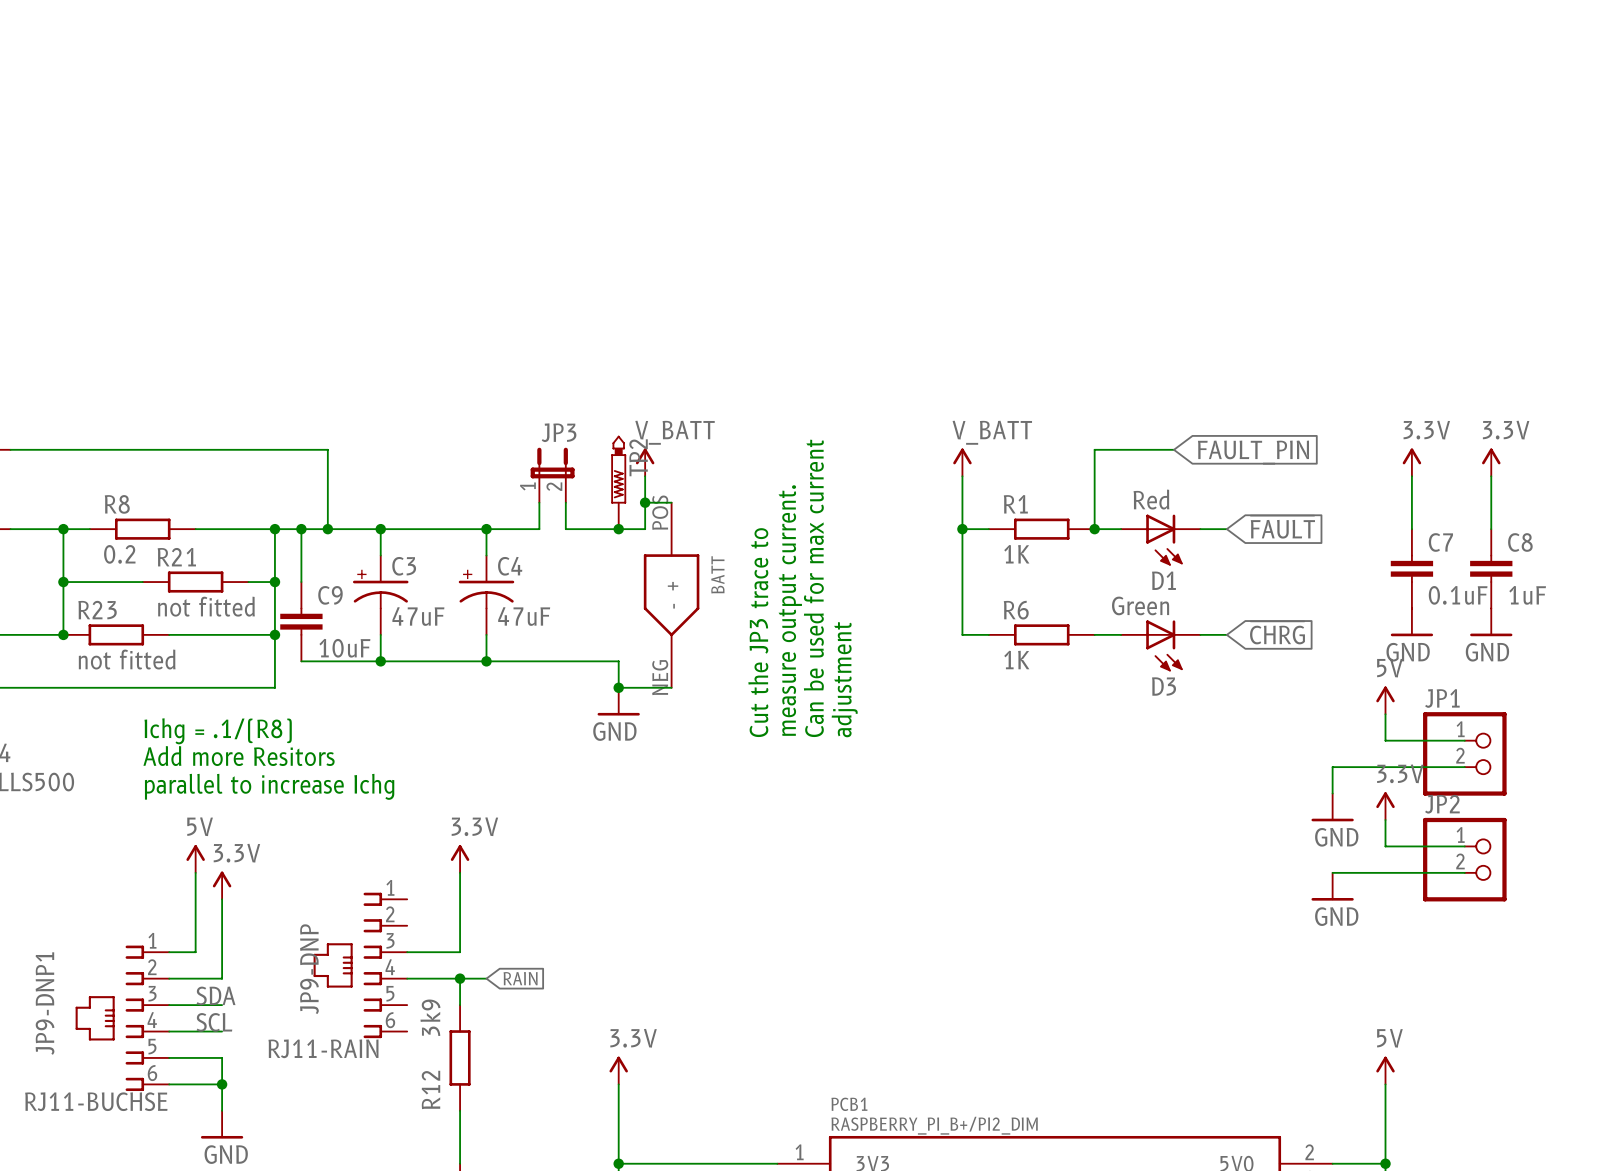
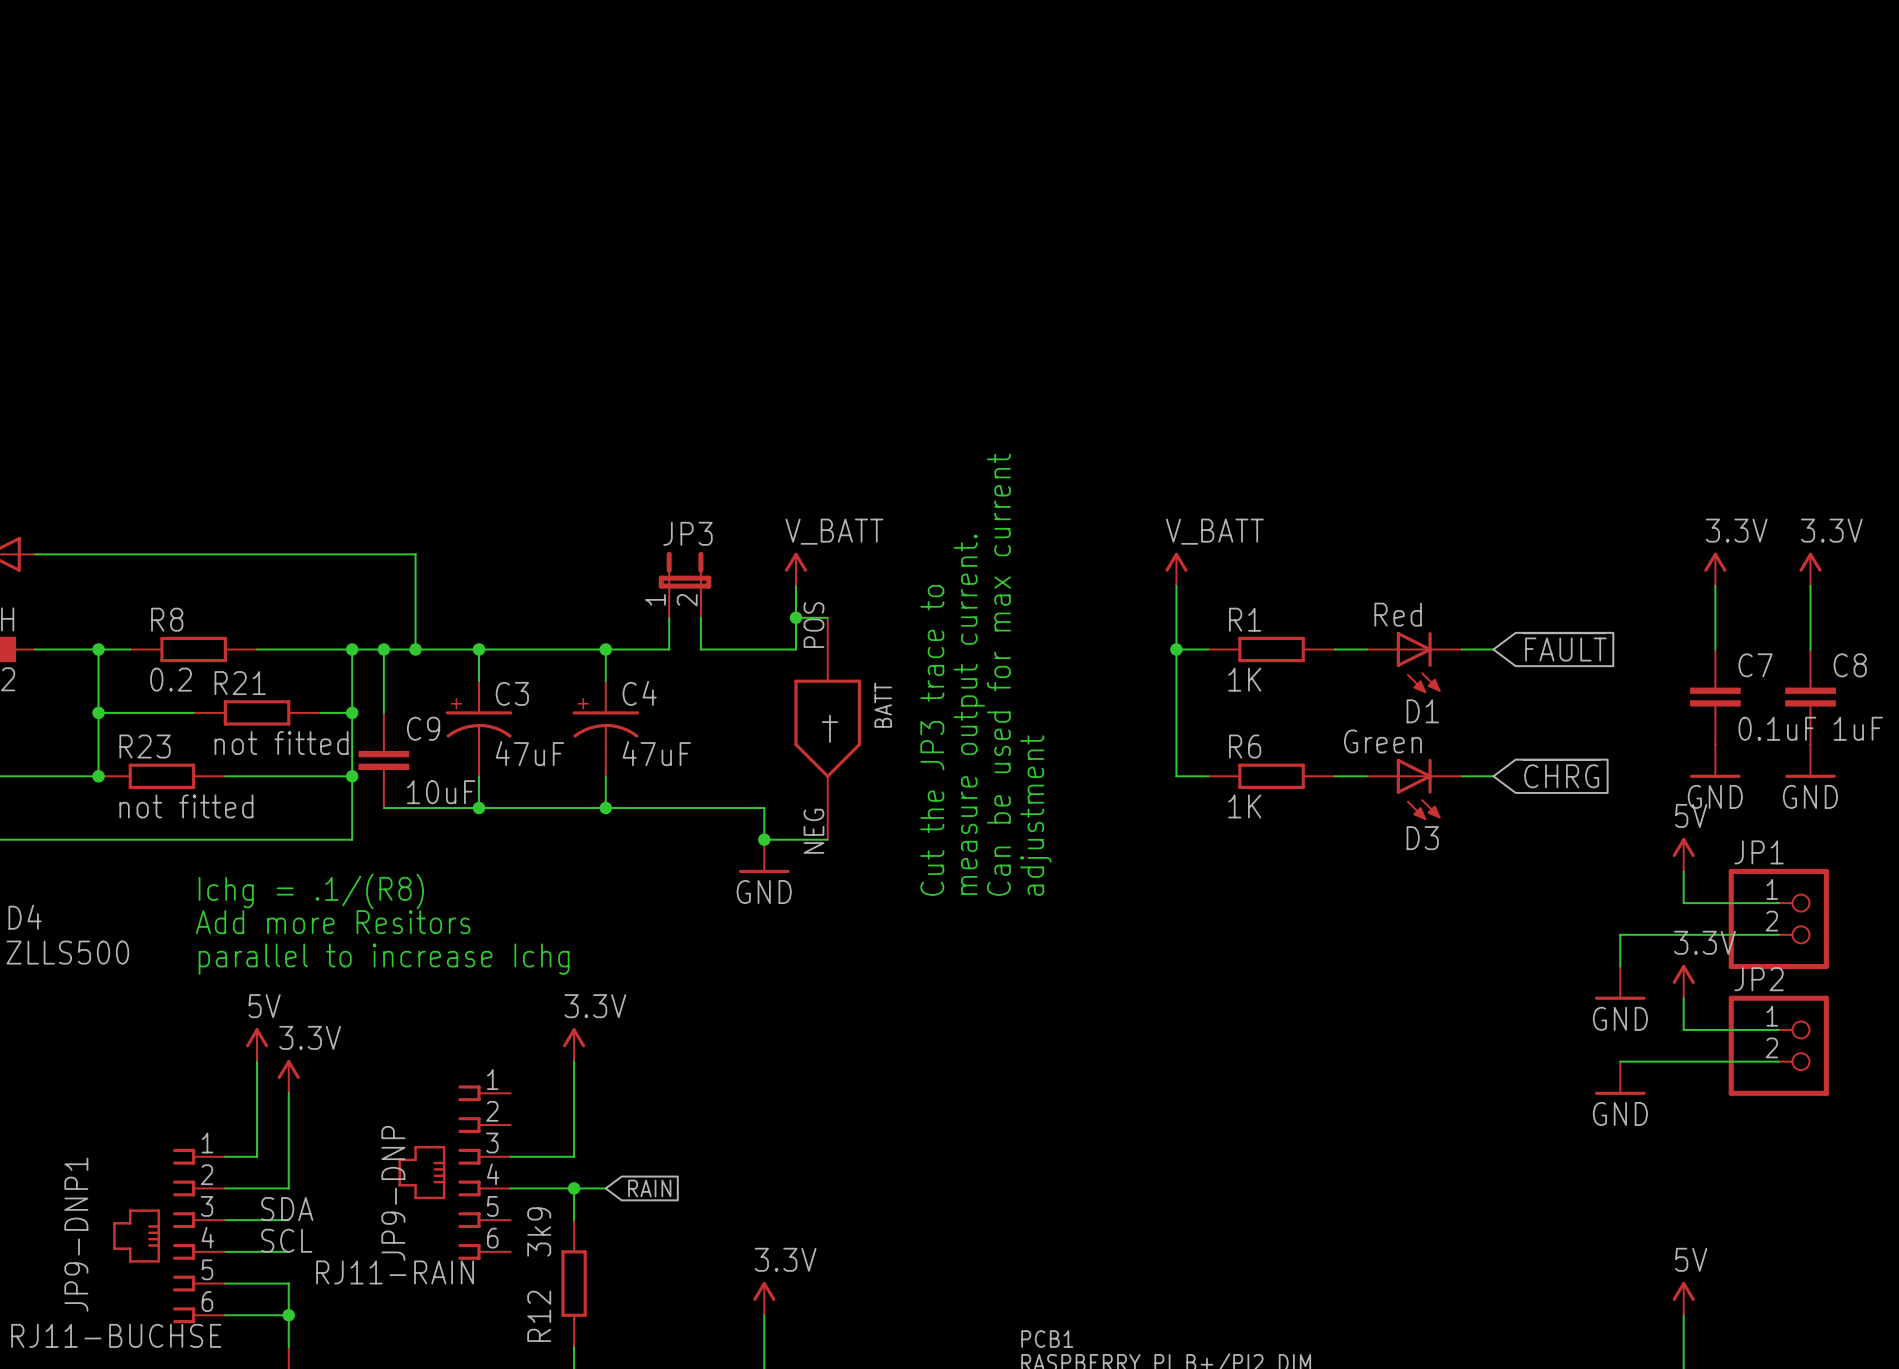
wire: (1173, 449) (1094, 449) (1094, 529) -> none
global label: FAULT_PIN (1253, 452) -> none
TP2: (618, 482) -> none
junction: (618, 529) -> none
junction: (1094, 529) -> none

